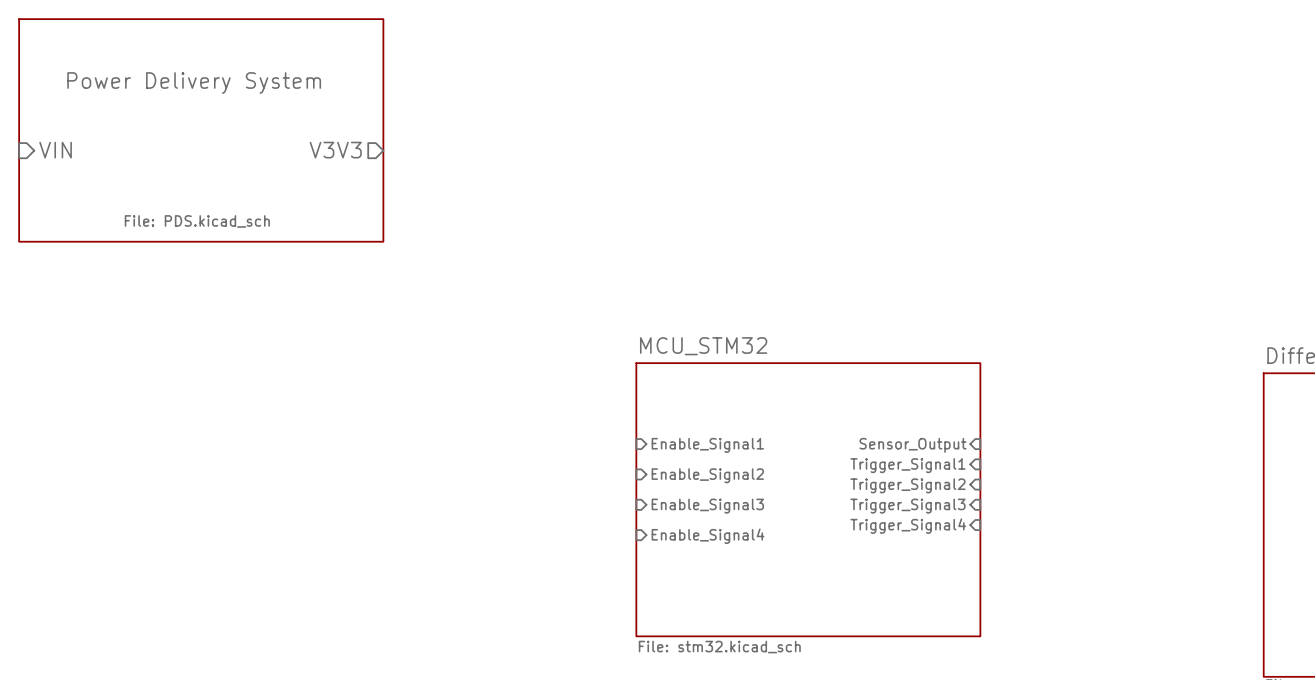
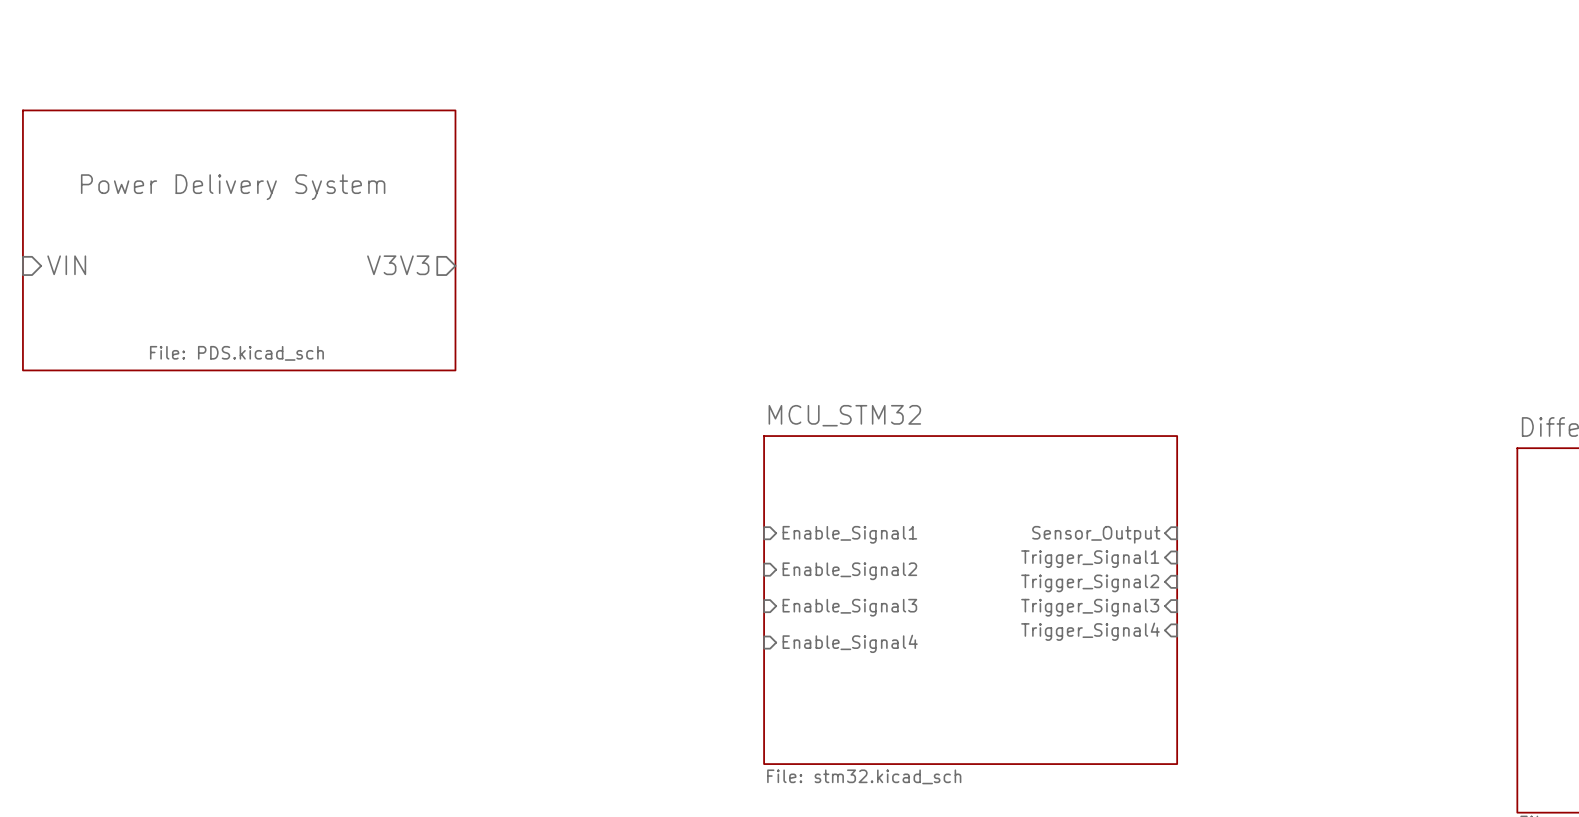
sheet Power Delivery System: File: PDS.kicad_sch (201, 130) -> none
sheet pin position: VIN (55, 150) -> VIN (66, 265)
sheet pin position: V3V3 (335, 150) -> V3V3 (398, 265)
sheet Power Delivery System: none -> File: PDS.kicad_sch (239, 240)

